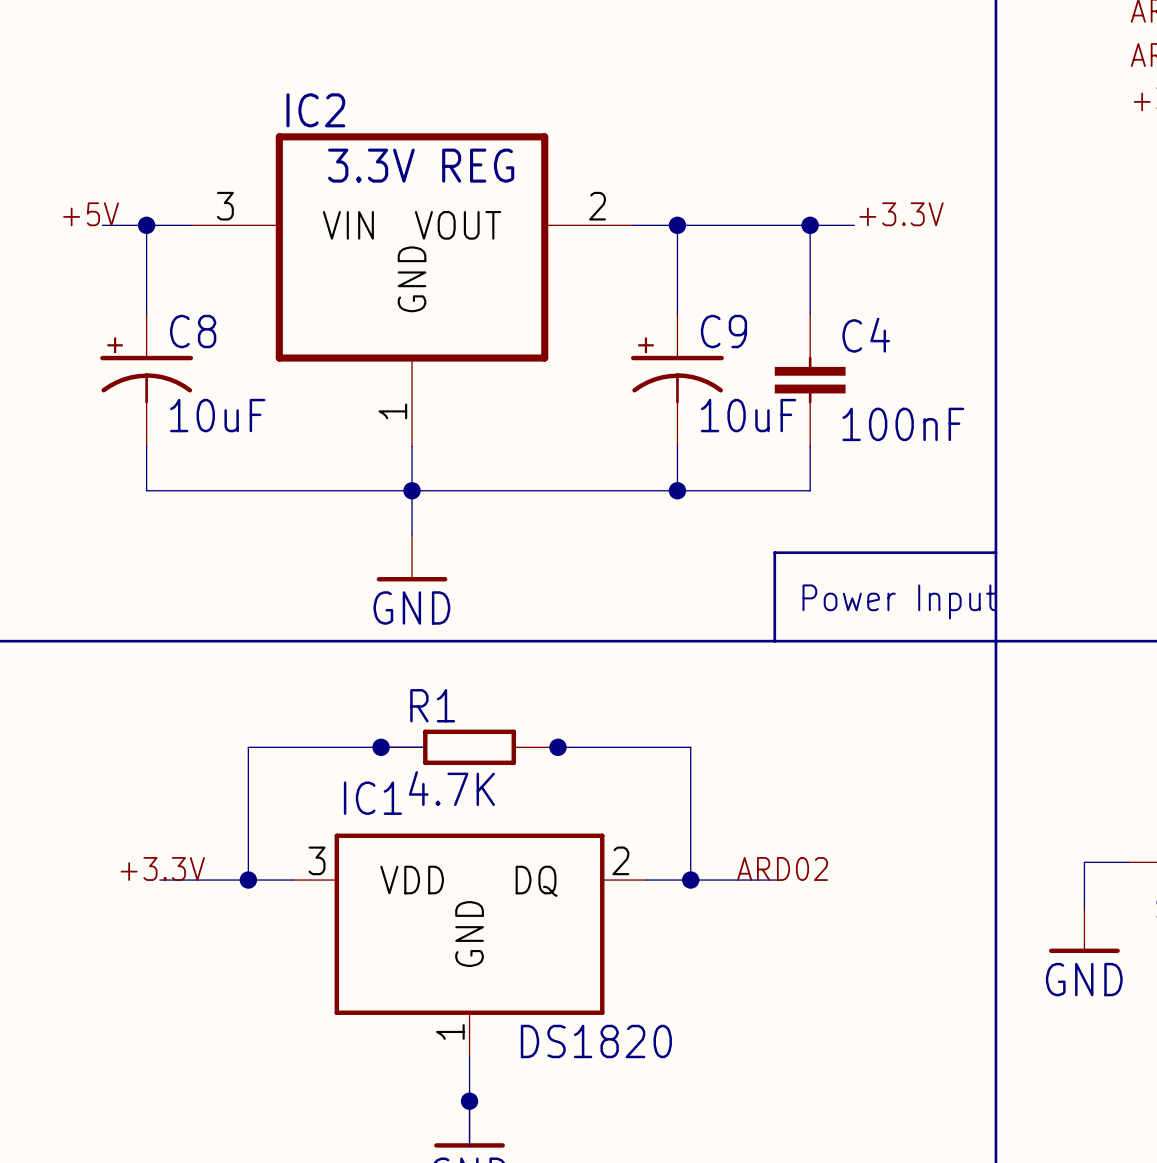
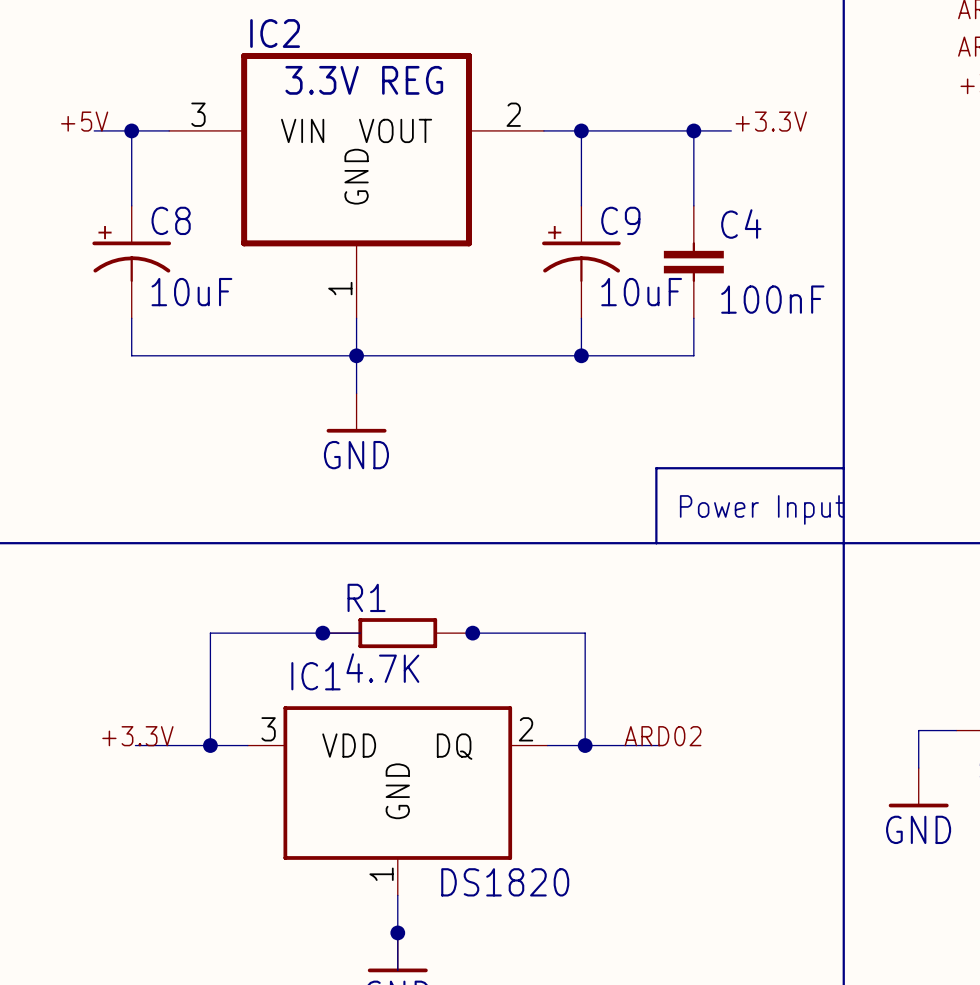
junction: none -> (581, 130)
junction: none -> (693, 130)
label position: +5V (91, 214) -> +5V (84, 121)
label position: +3.3V (901, 214) -> +3.3V (771, 121)
wire: (102, 225) (190, 225) -> (94, 130) (169, 130)
wire: (146, 225) (146, 313) -> (131, 130) (131, 205)
junction position: (146, 225) -> (131, 130)
wire: (633, 225) (854, 225) -> (543, 130) (731, 130)
wire: (677, 225) (677, 313) -> (581, 130) (581, 205)
junction: (677, 225) -> none
wire: (810, 225) (810, 313) -> (693, 130) (693, 205)
junction: (810, 225) -> none
IC2 position: (412, 289) -> (356, 185)
C8 position: (146, 380) -> (131, 262)
C9 position: (677, 380) -> (581, 262)
C4 position: (810, 380) -> (693, 262)
wire: (146, 446) (146, 490) (810, 490) (810, 446) -> (131, 318) (131, 355) (693, 355) (693, 318)
wire: (412, 446) (412, 534) -> (356, 318) (356, 393)
wire: (677, 446) (677, 490) -> (581, 318) (581, 355)
junction position: (412, 490) -> (356, 355)
junction position: (677, 490) -> (581, 355)
power symbol position: GND (412, 558) -> GND (356, 412)

